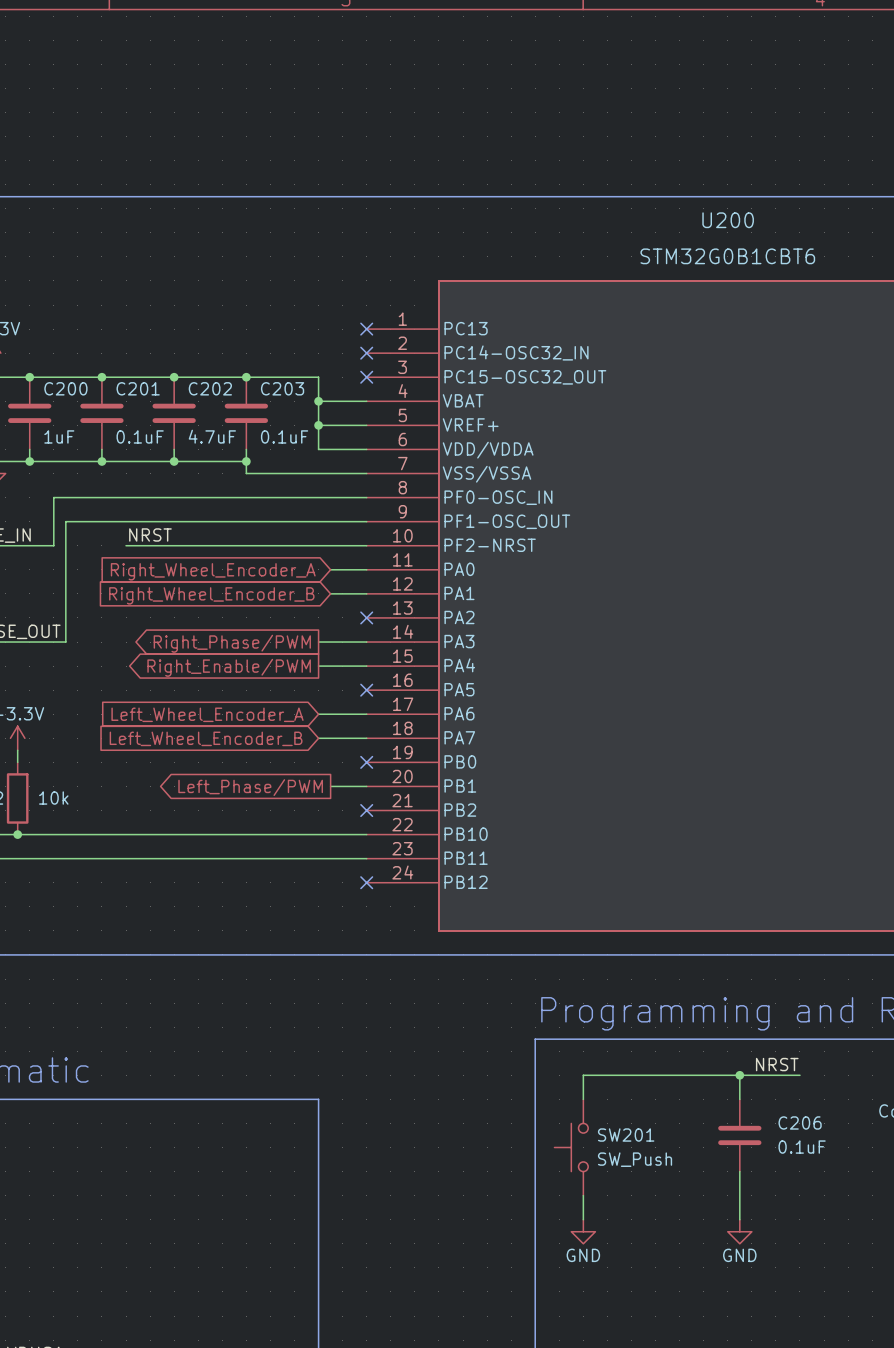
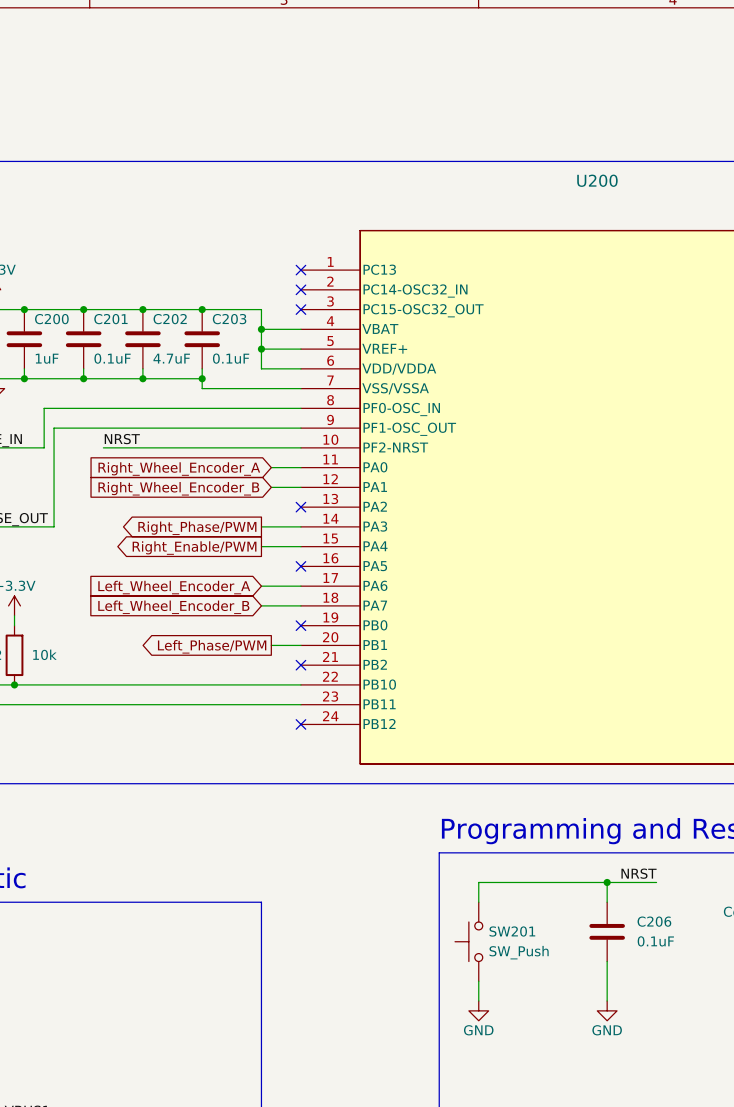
U200 value: STM32G0B1CBT6 (727, 256) -> none

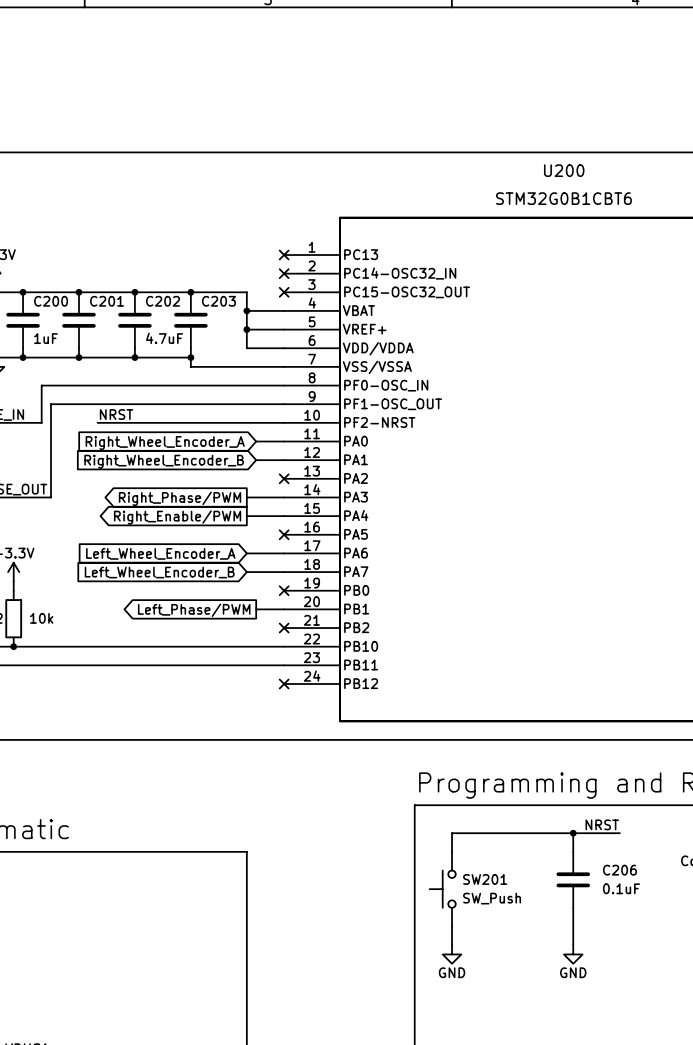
U200 value: none -> STM32G0B1CBT6 (563, 198)
C201 value: 0.1uF (112, 358) -> none
C203 value: 0.1uF (231, 358) -> none

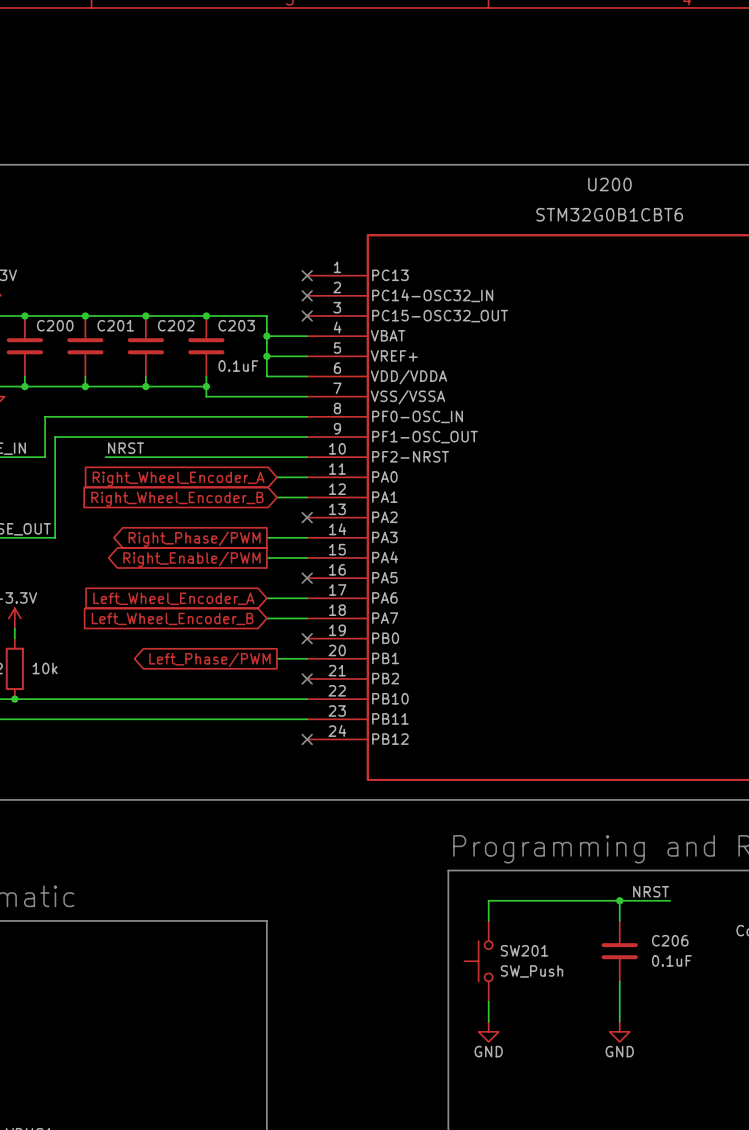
C200 value: 1uF (45, 338) -> none
C202 value: 4.7uF (164, 338) -> none
C203 value: none -> 0.1uF (238, 366)

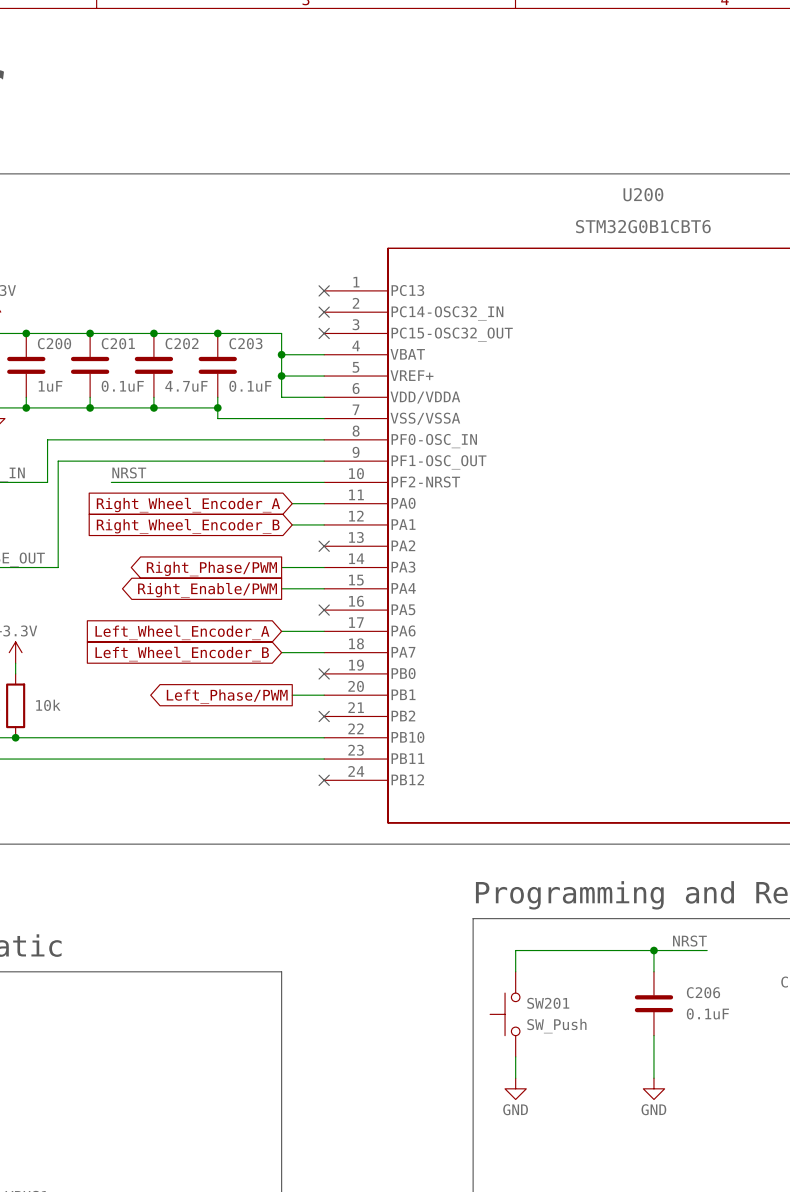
C202 value: none -> 4.7uF (186, 386)
C200 value: none -> 1uF (50, 386)
C201 value: none -> 0.1uF (122, 386)

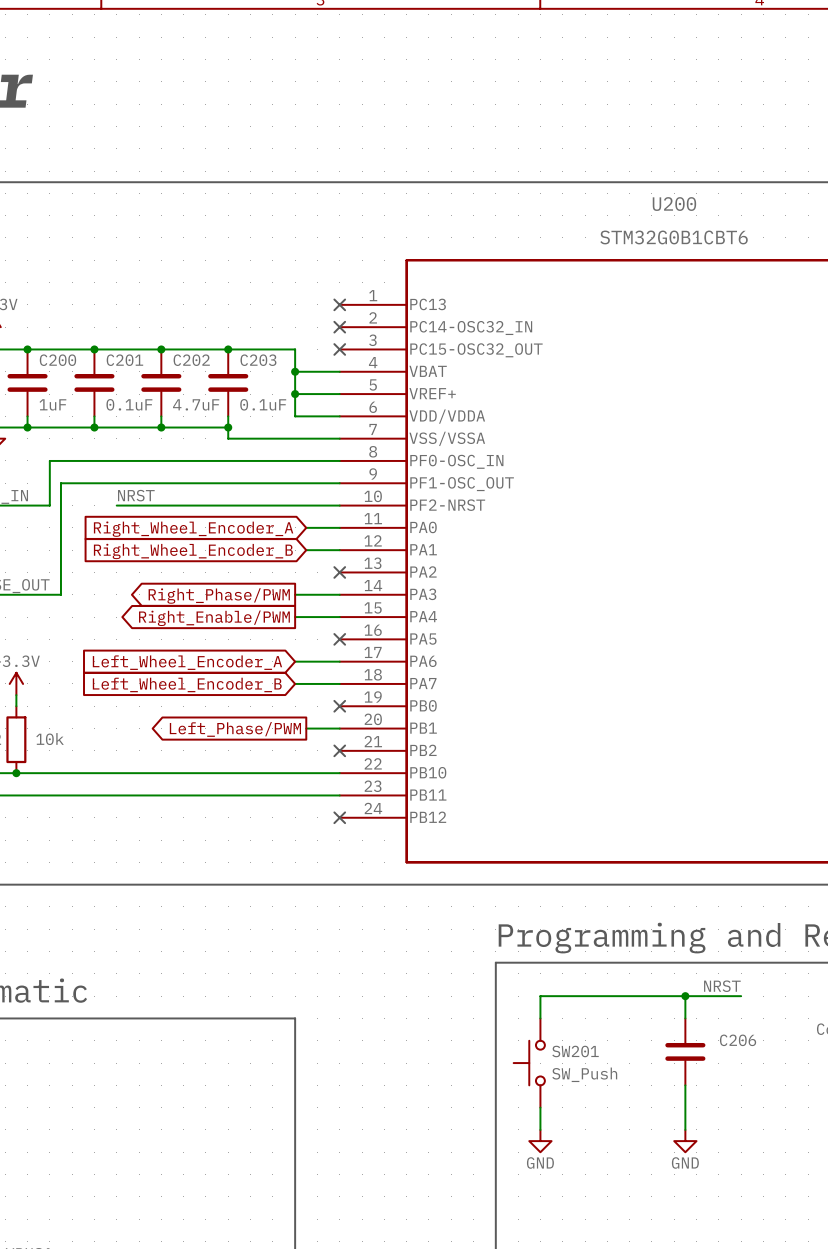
C206 value: 0.1uF (707, 1013) -> none

